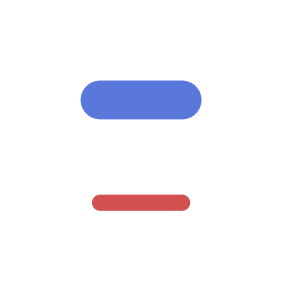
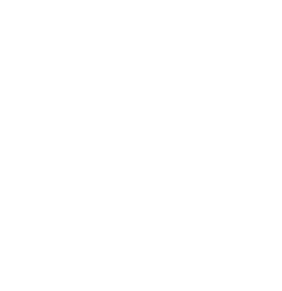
bottom track: (99, 99) (182, 99) -> none
top track: (99, 202) (182, 202) -> none

